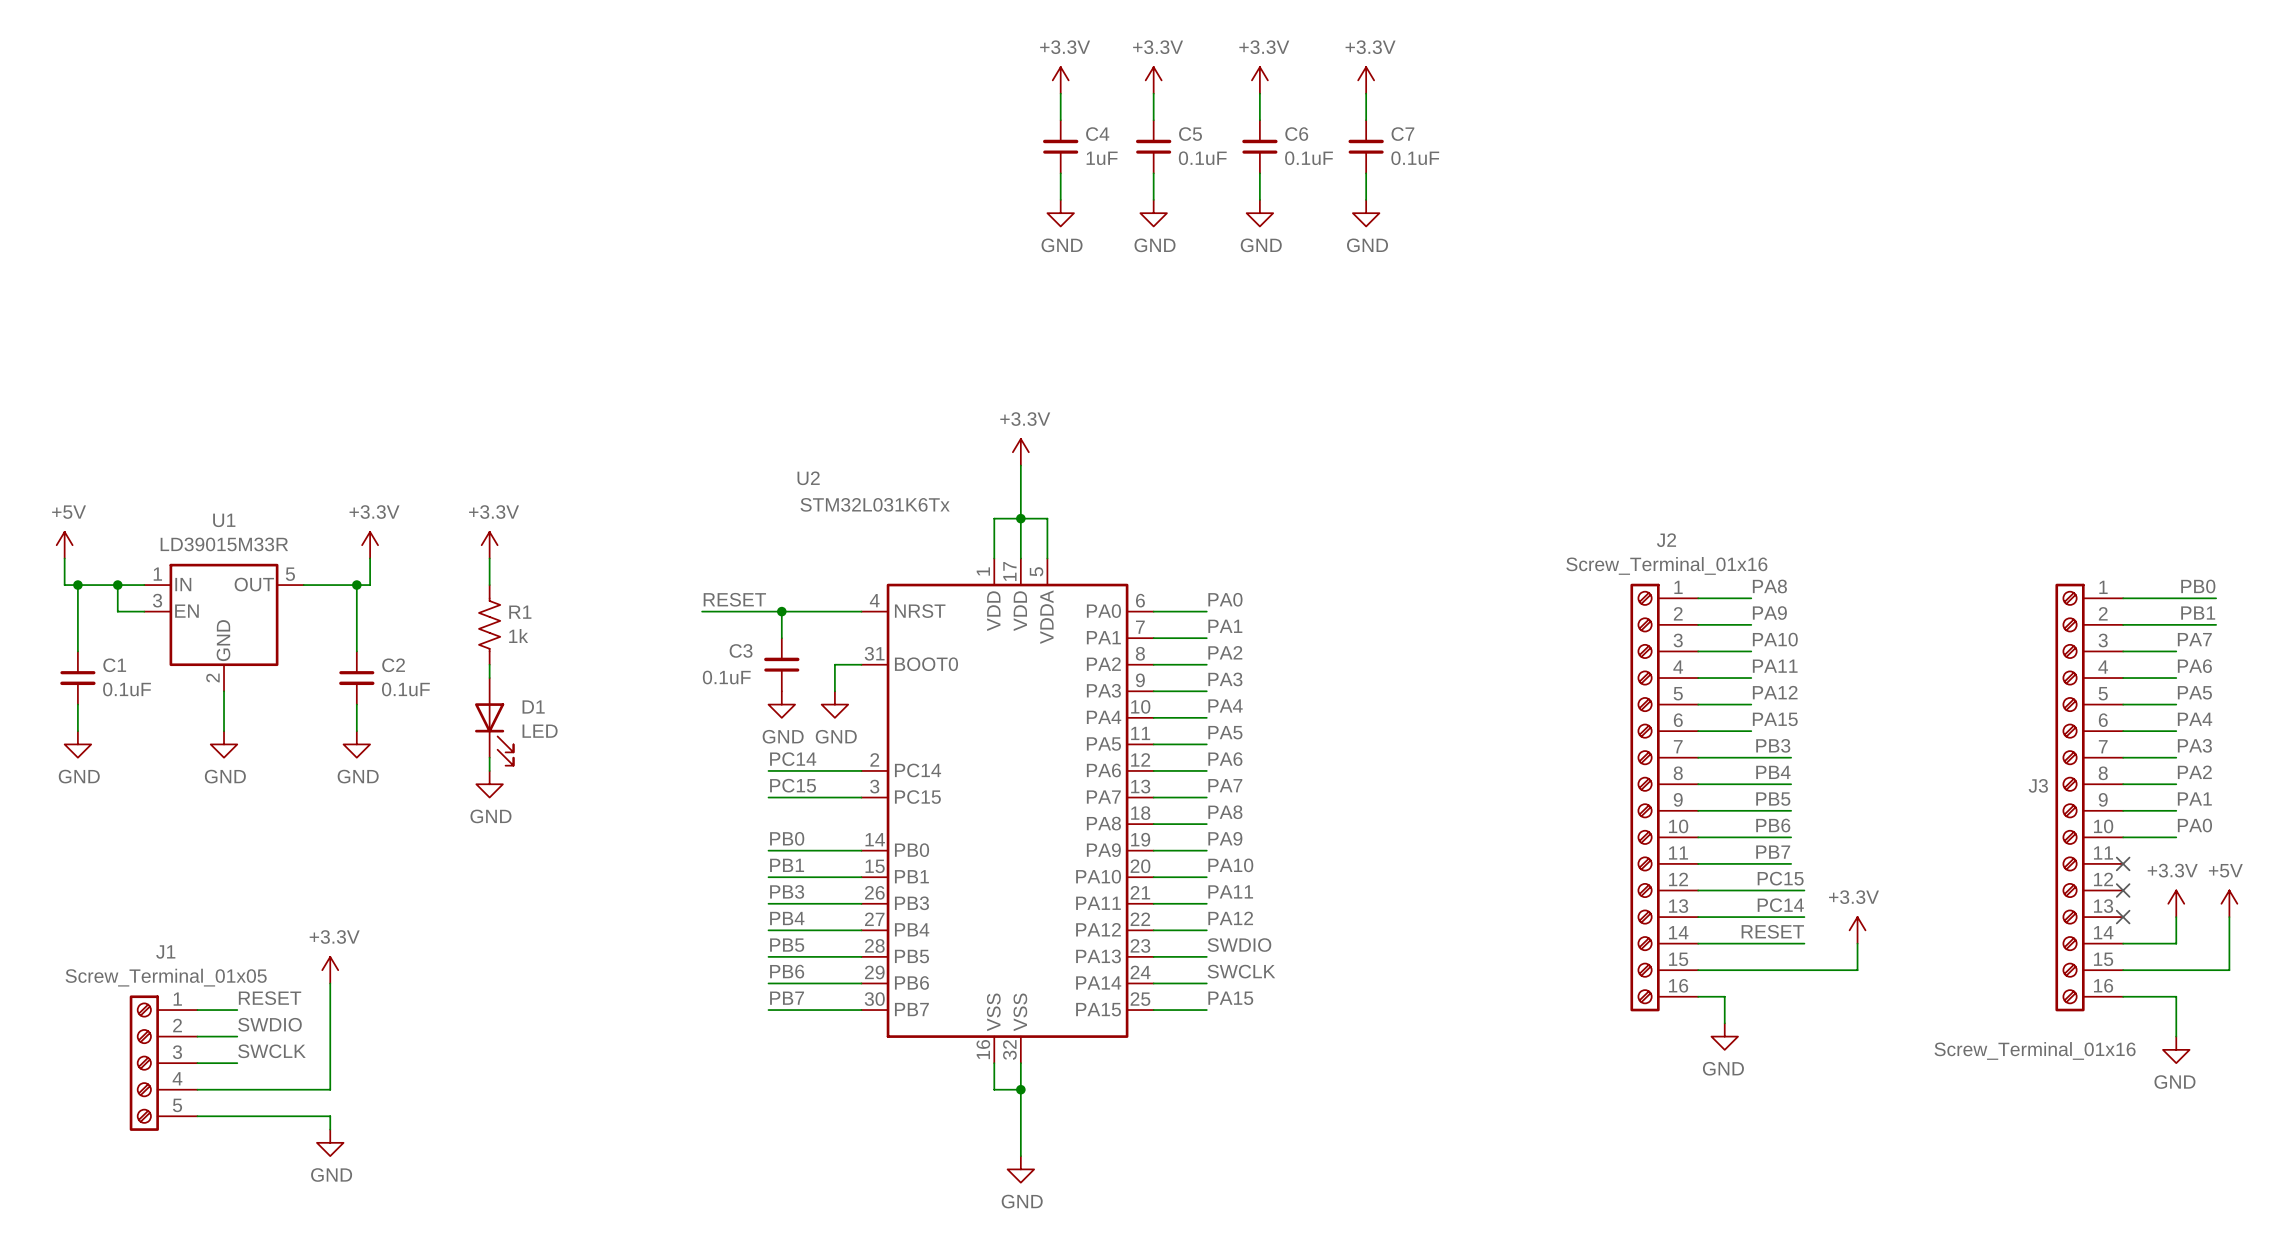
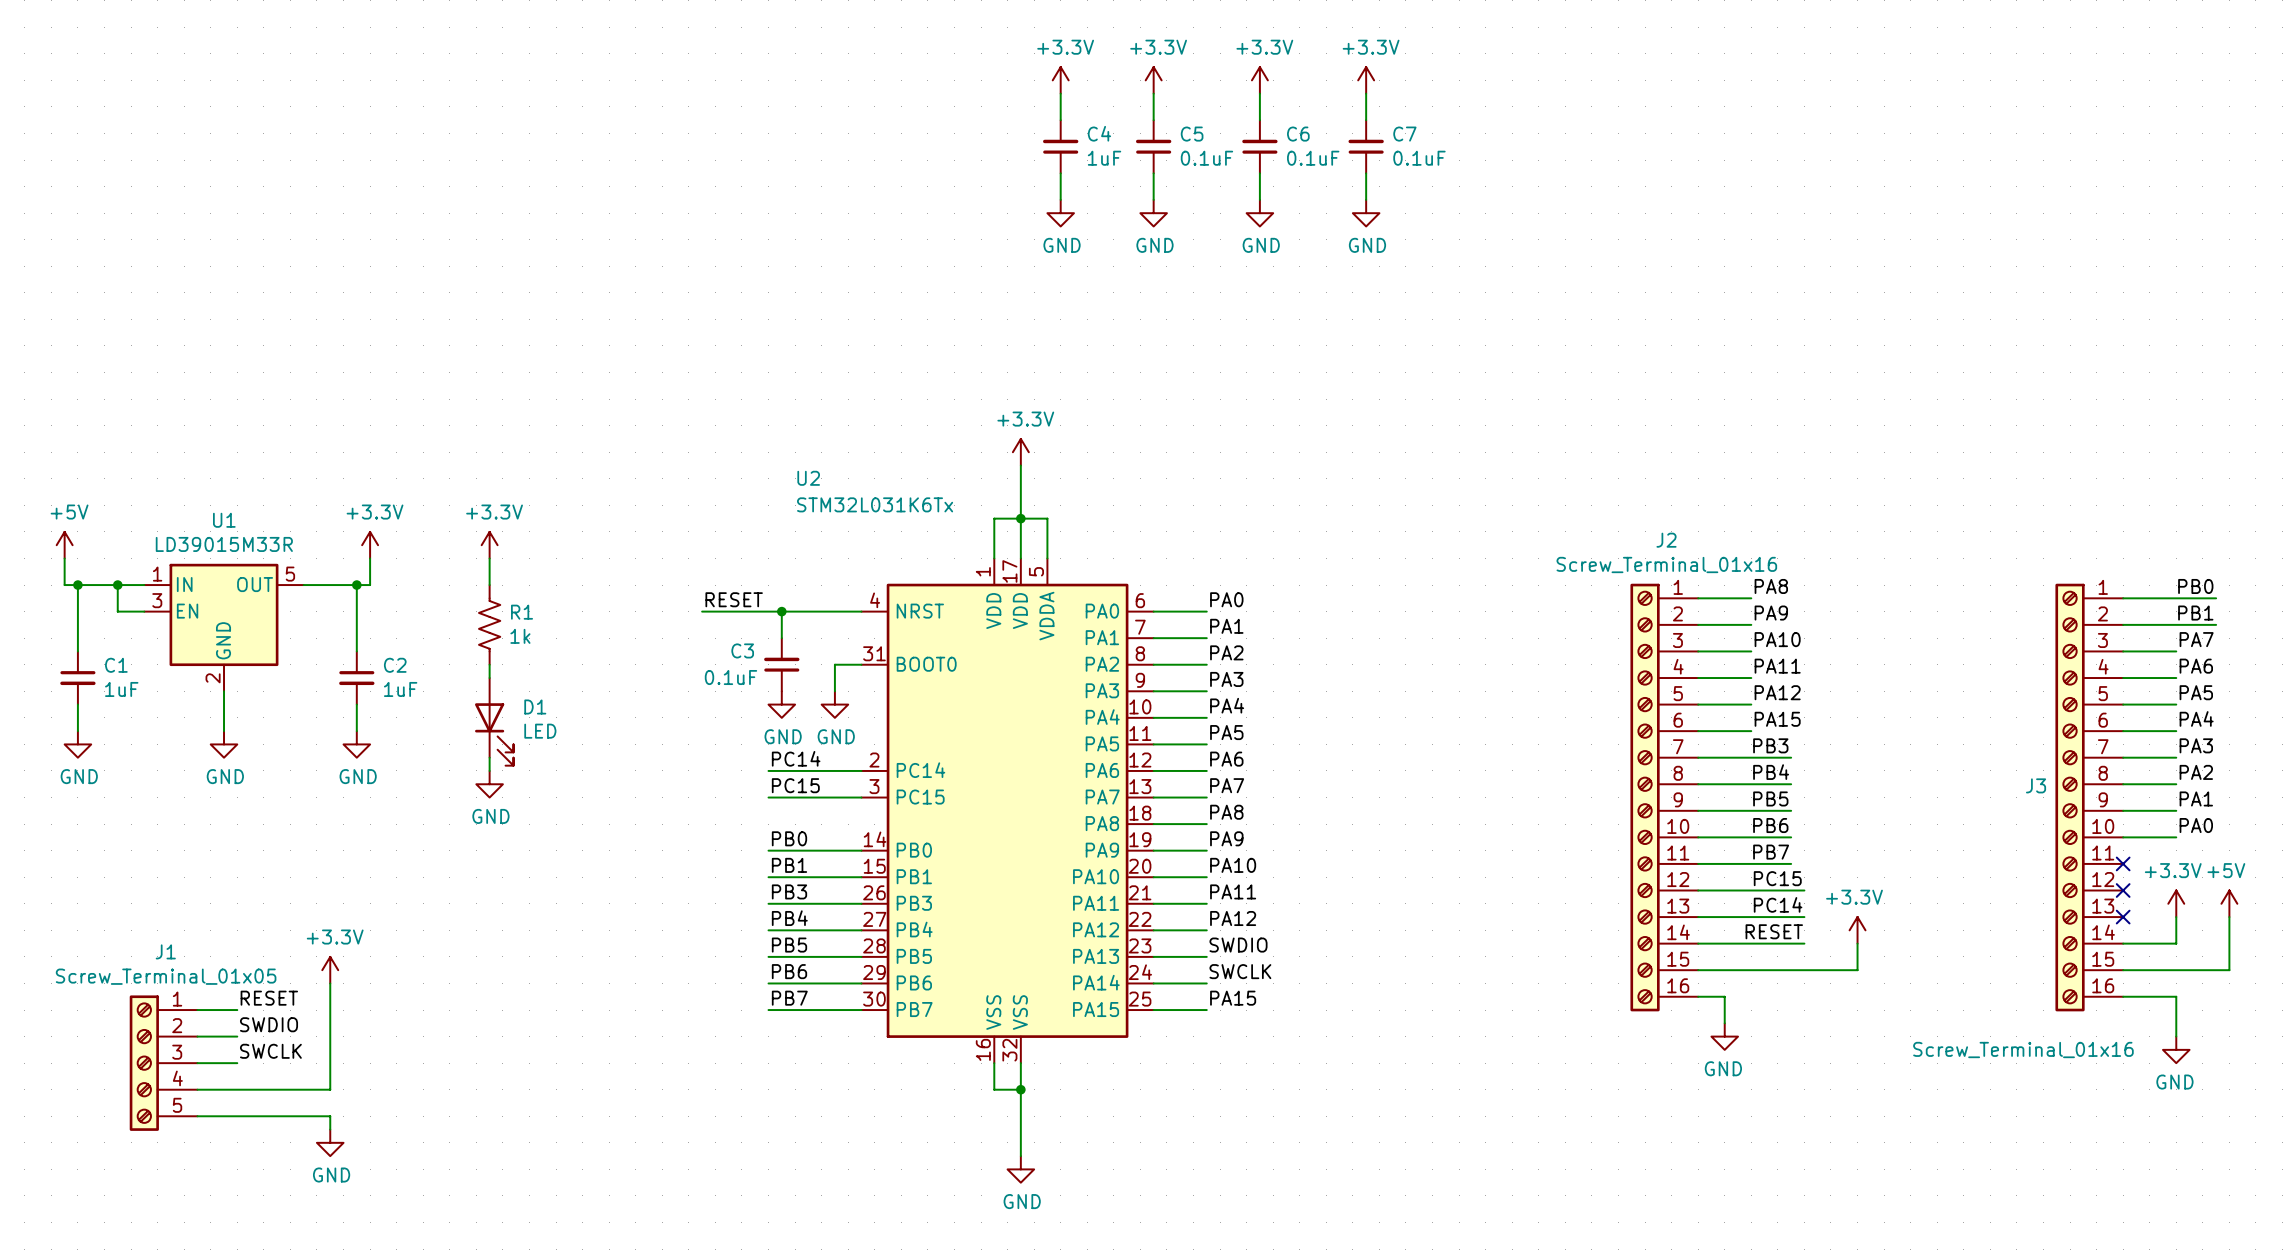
C1 value: 0.1uF (127, 689) -> 1uF (121, 689)
C2 value: 0.1uF (405, 689) -> 1uF (400, 689)

